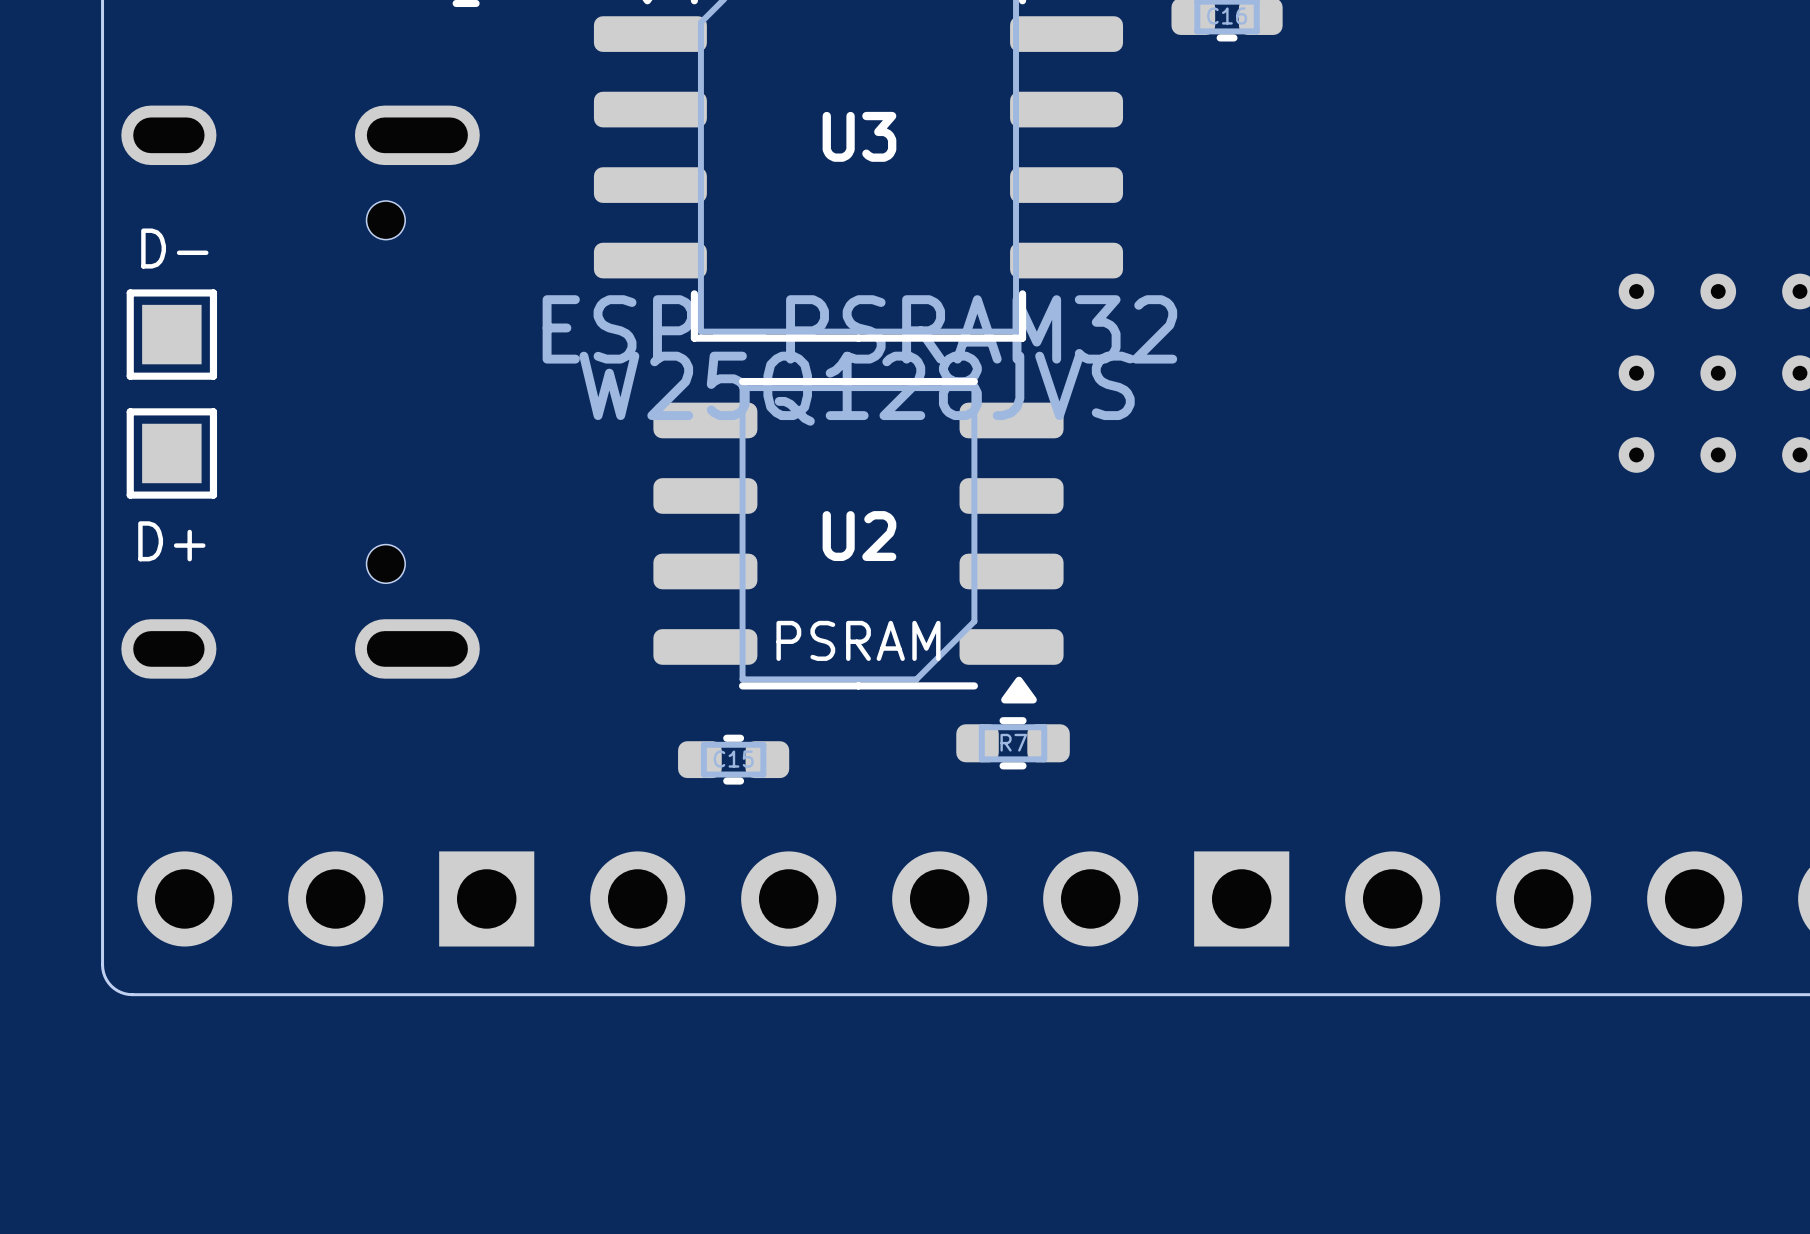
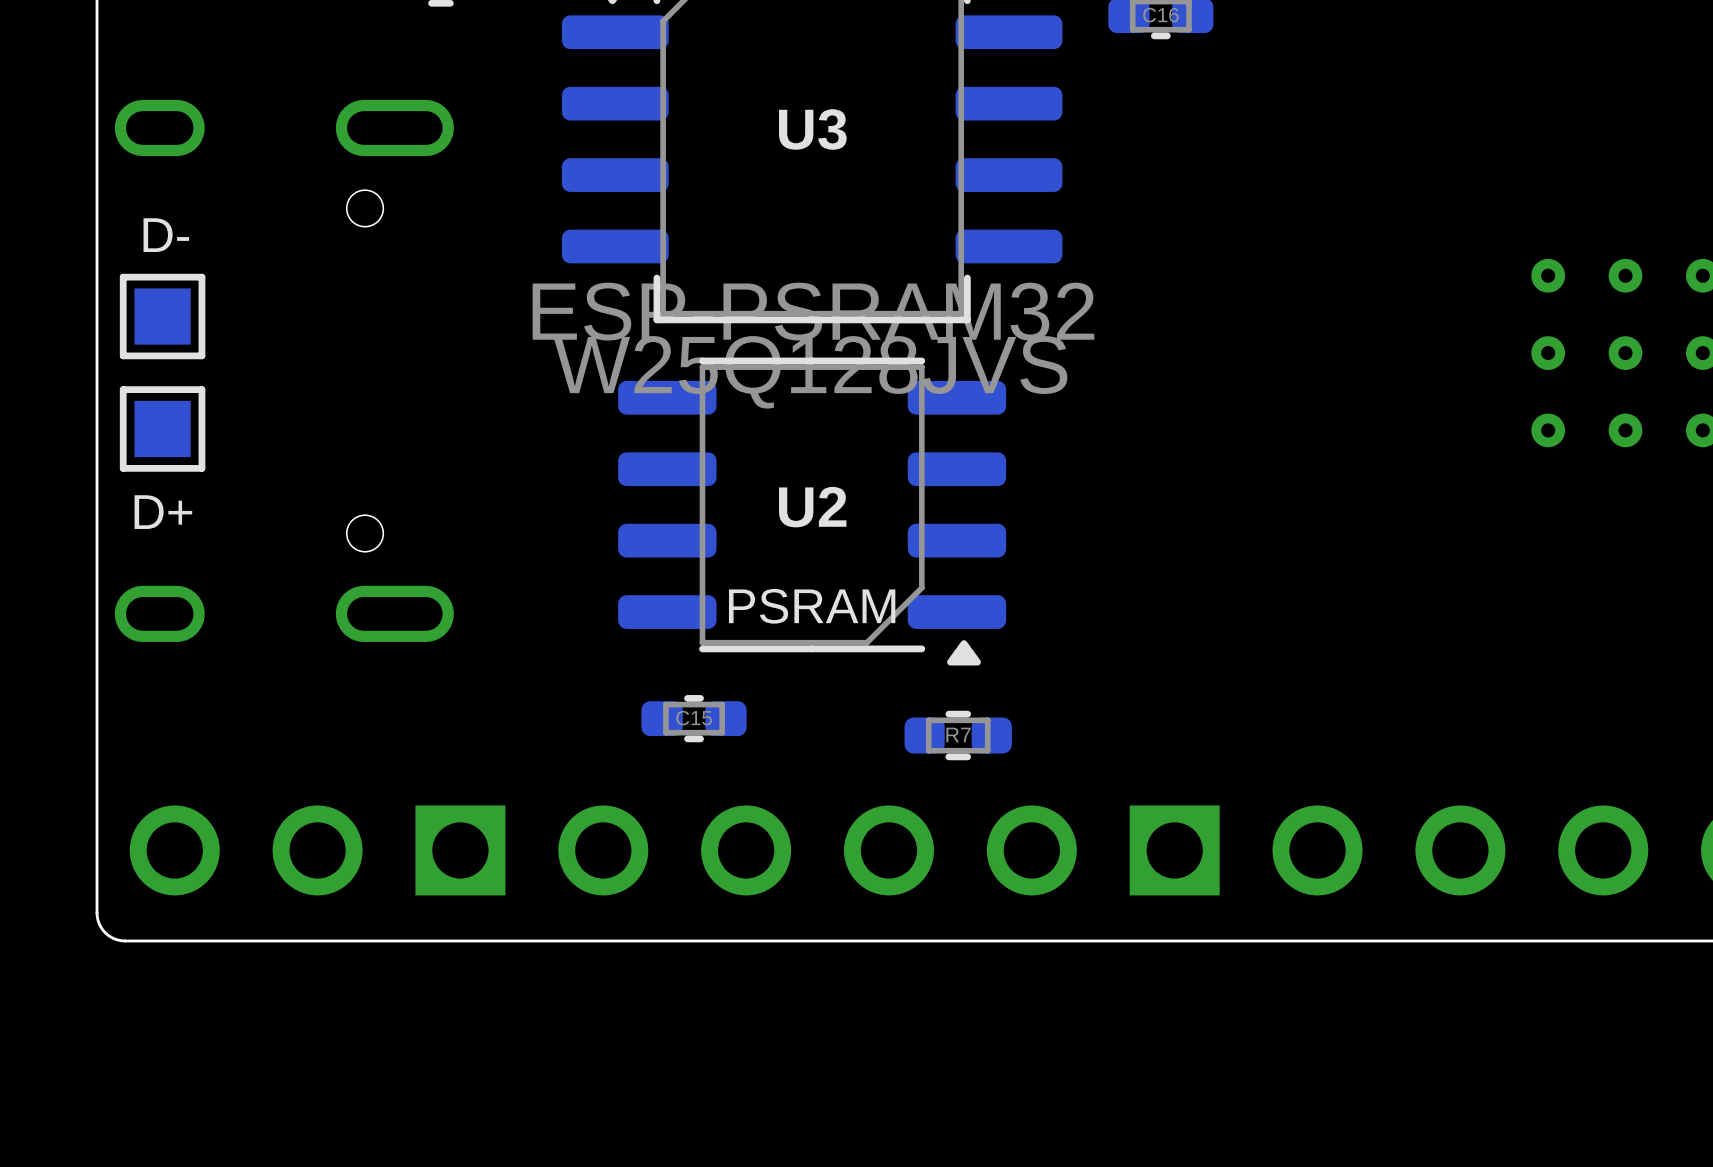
R7 position: (1013, 743) -> (958, 735)

